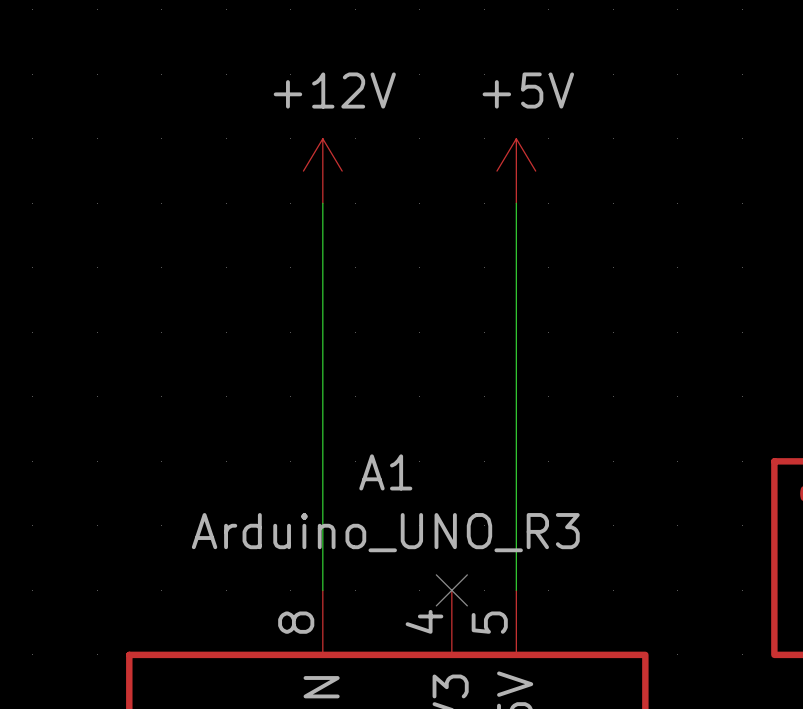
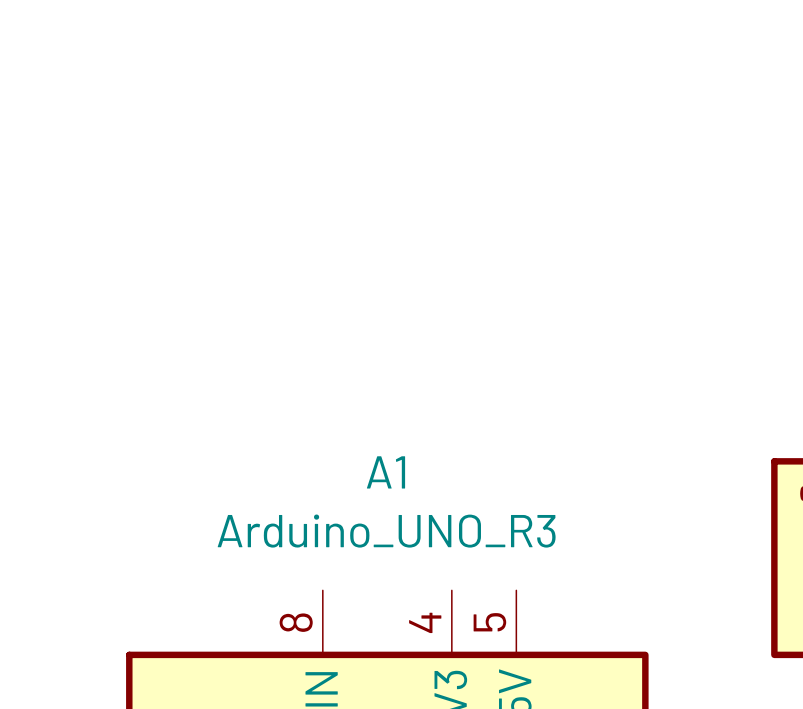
power symbol: +12V (322, 171) -> none
power symbol: +5V (516, 171) -> none
wire: (322, 203) (322, 590) -> none
wire: (516, 203) (516, 590) -> none
no-connect mark: (451, 590) -> none

